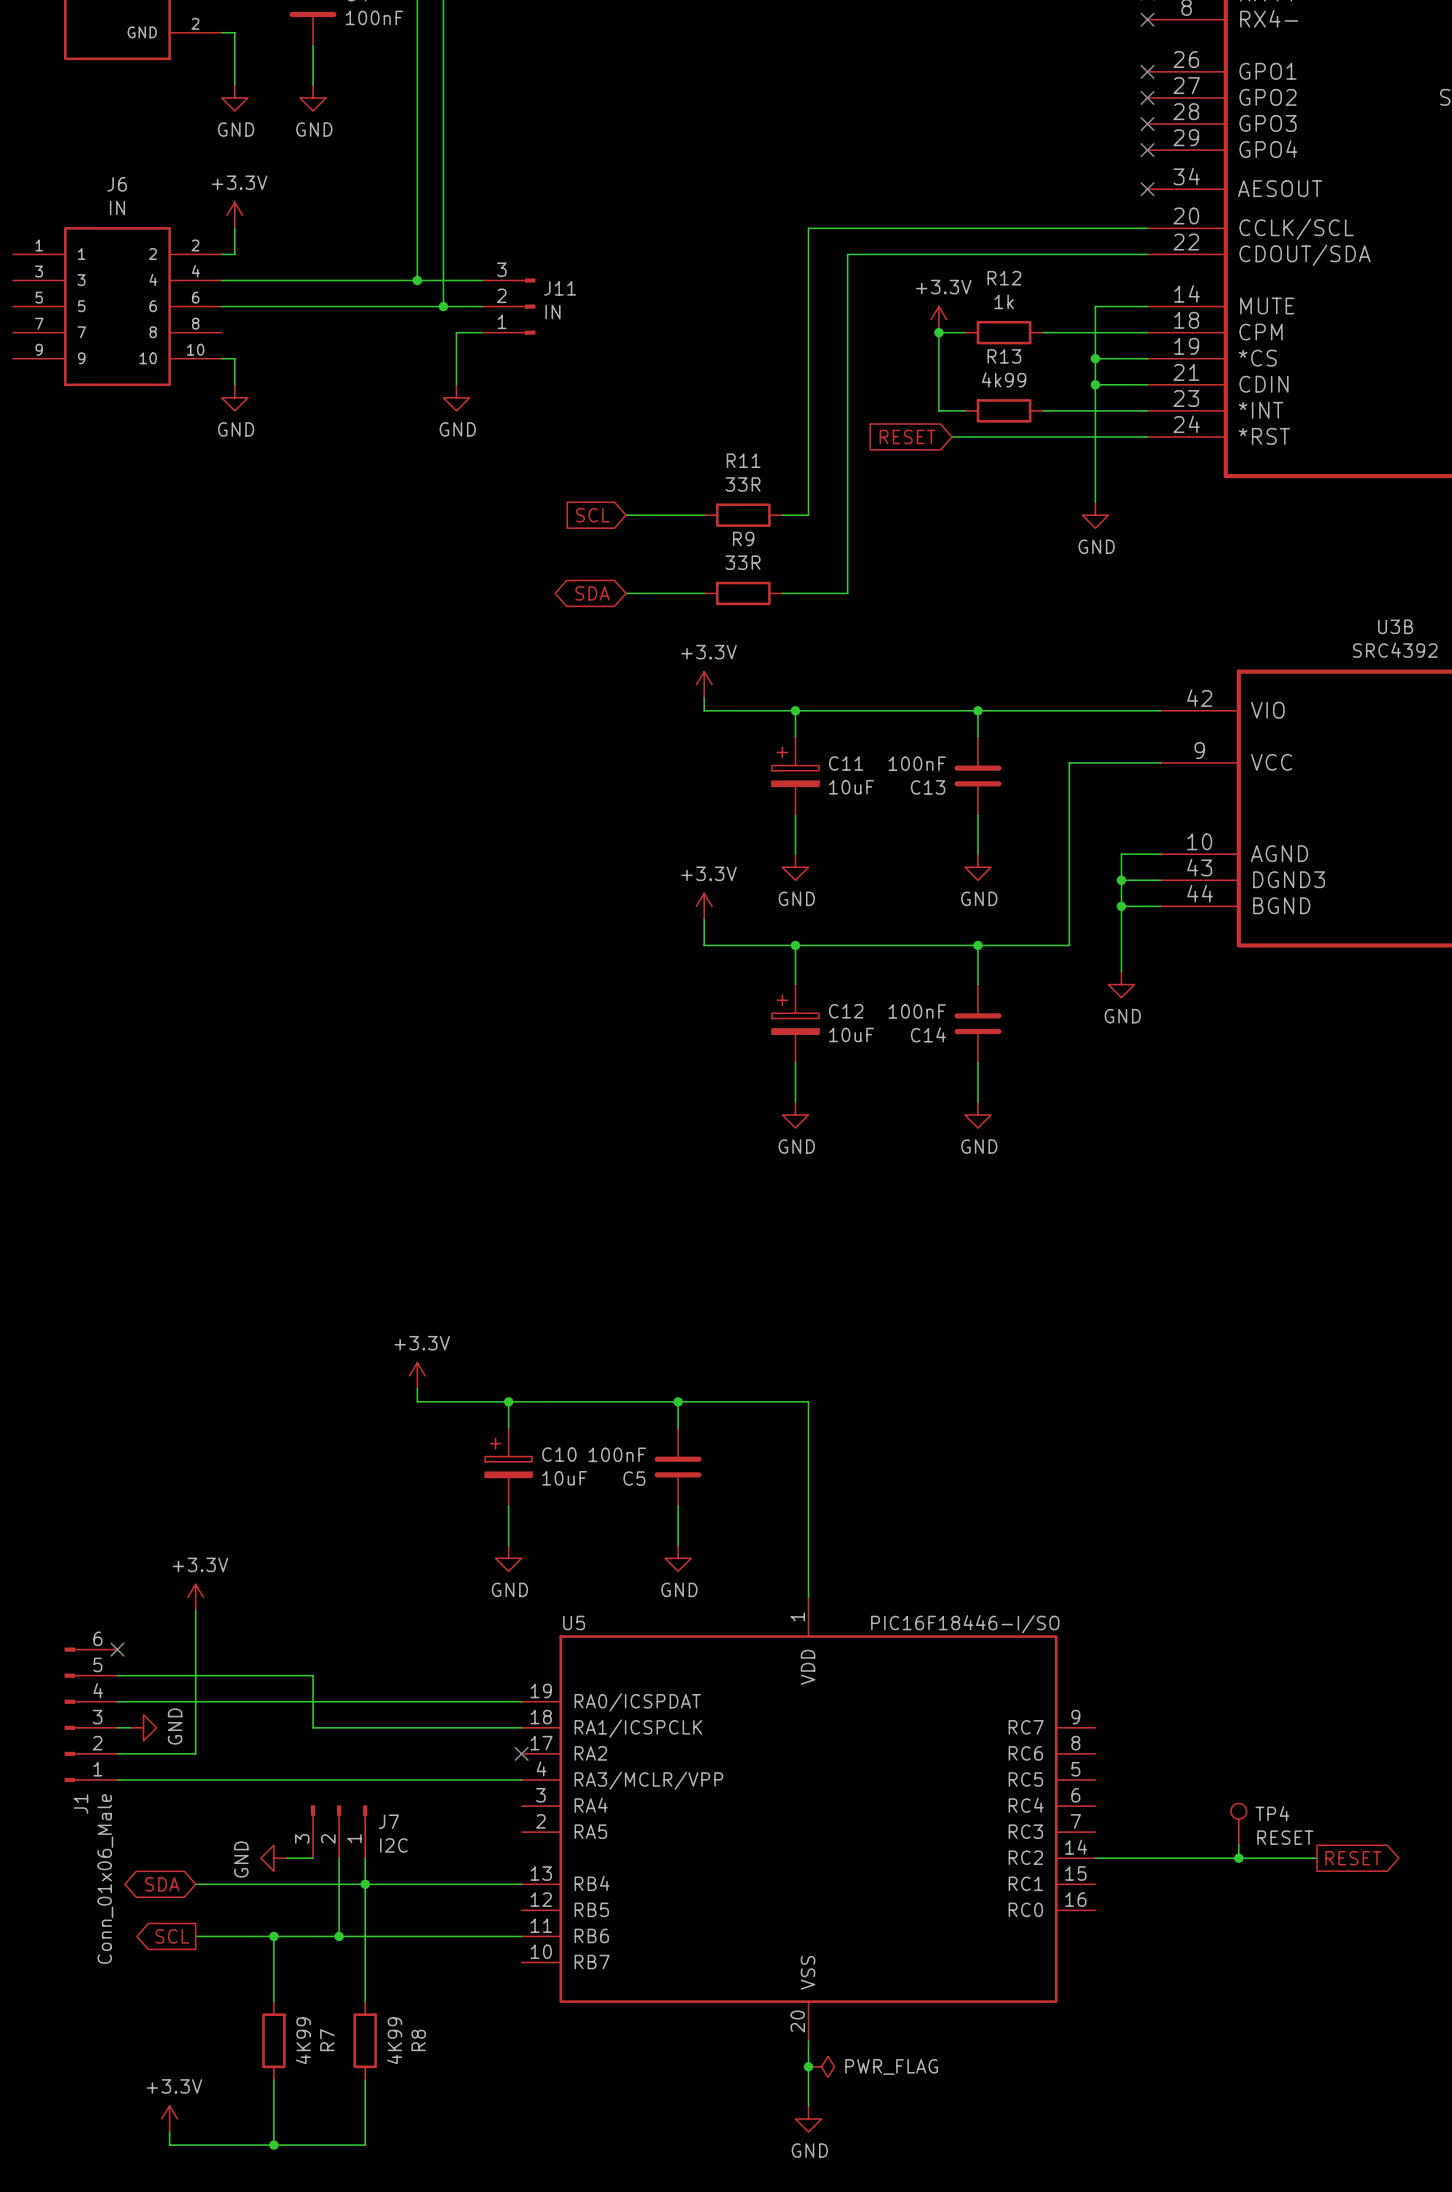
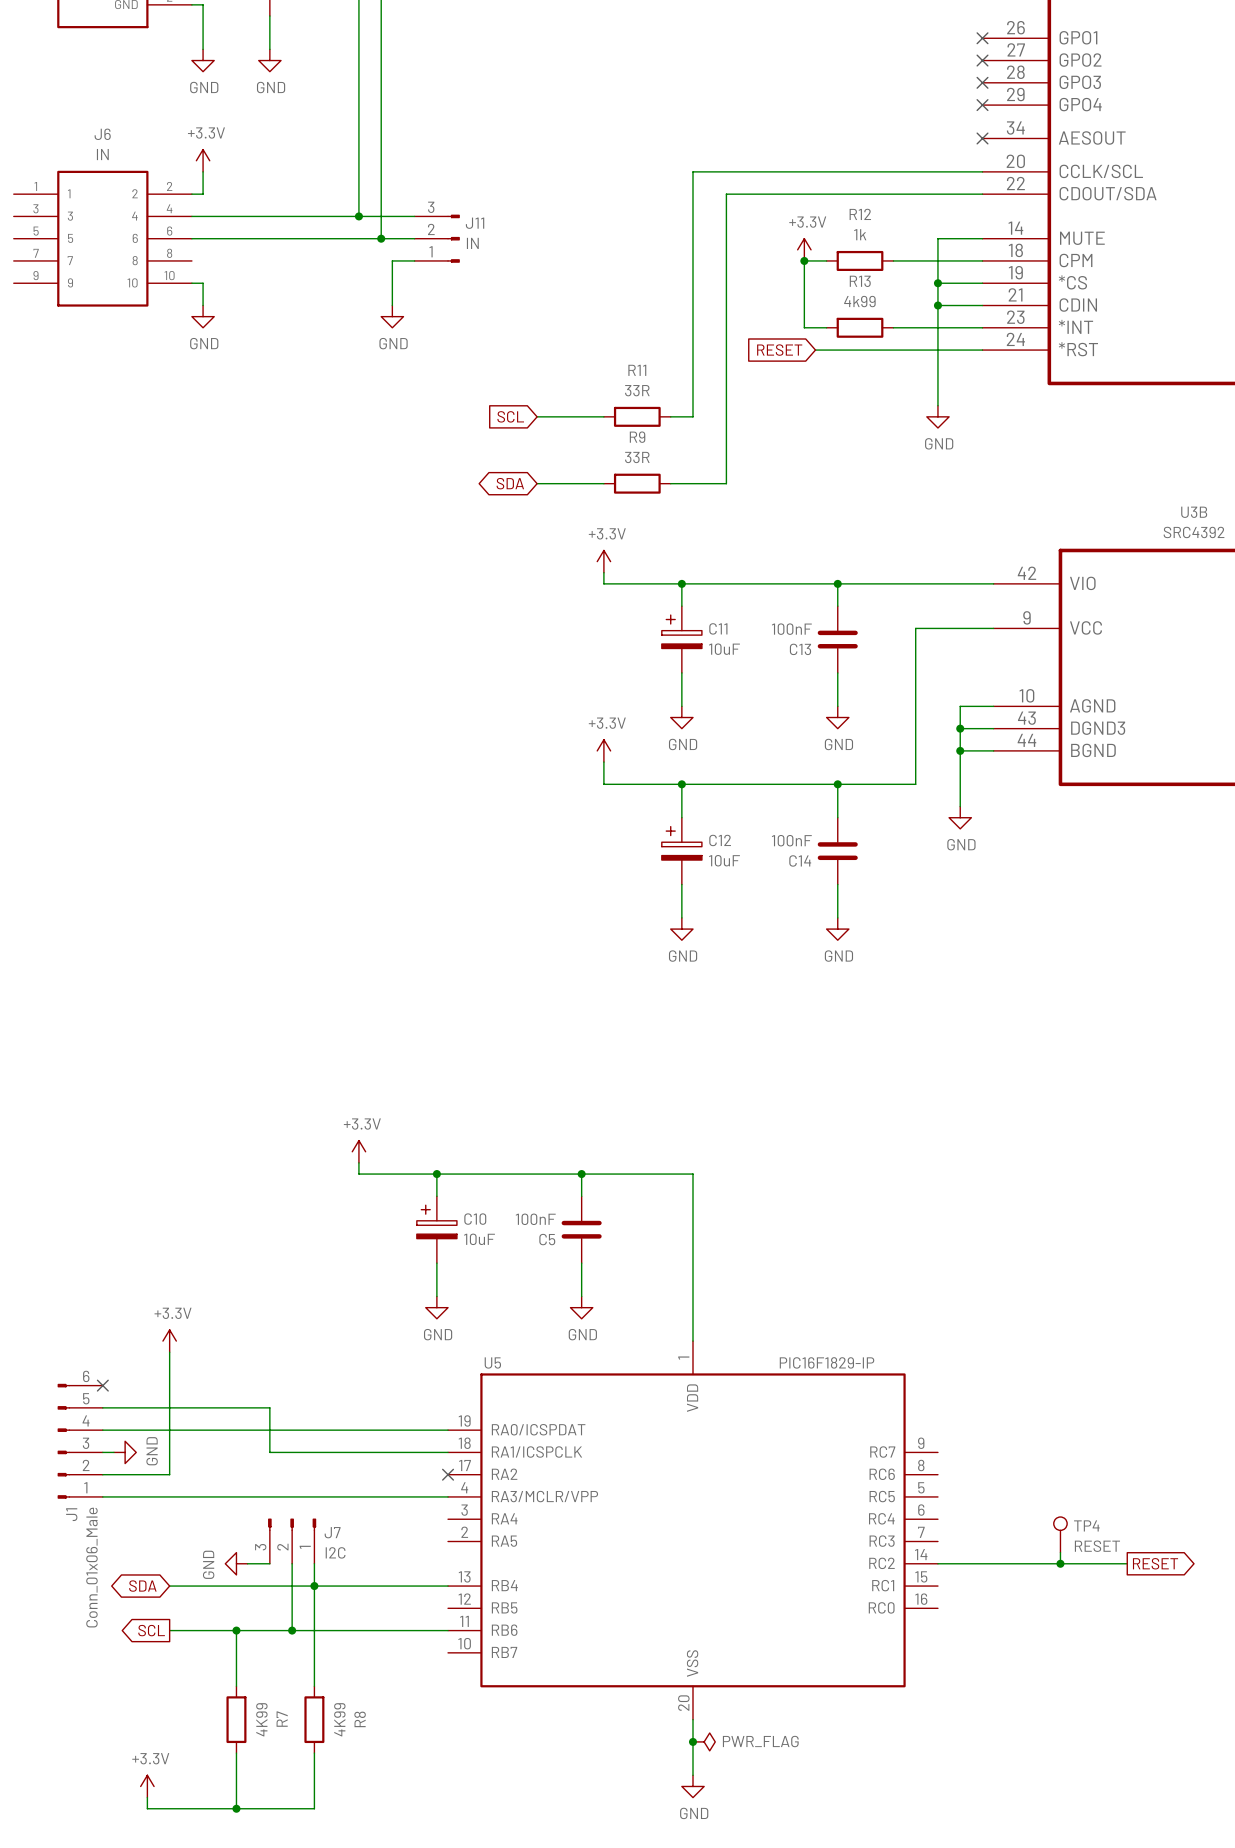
U5 value: PIC16F18446-I/SO (965, 1624) -> PIC16F1829-IP (827, 1362)

